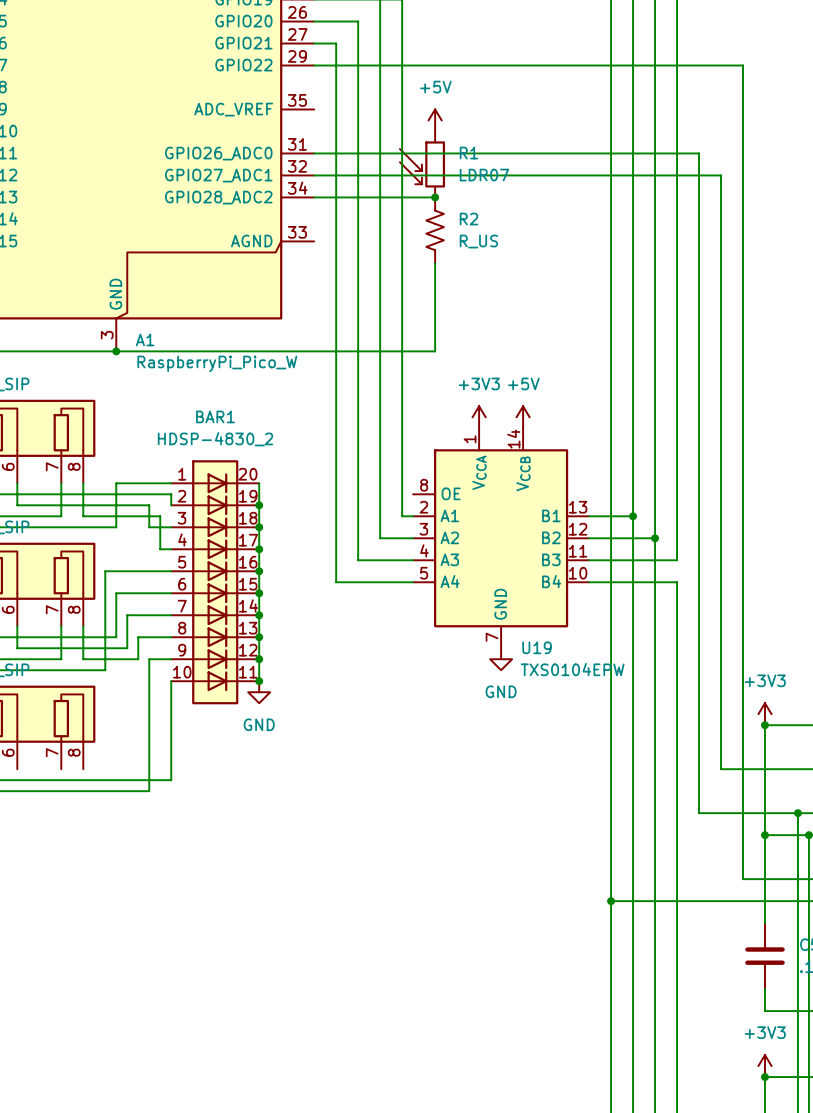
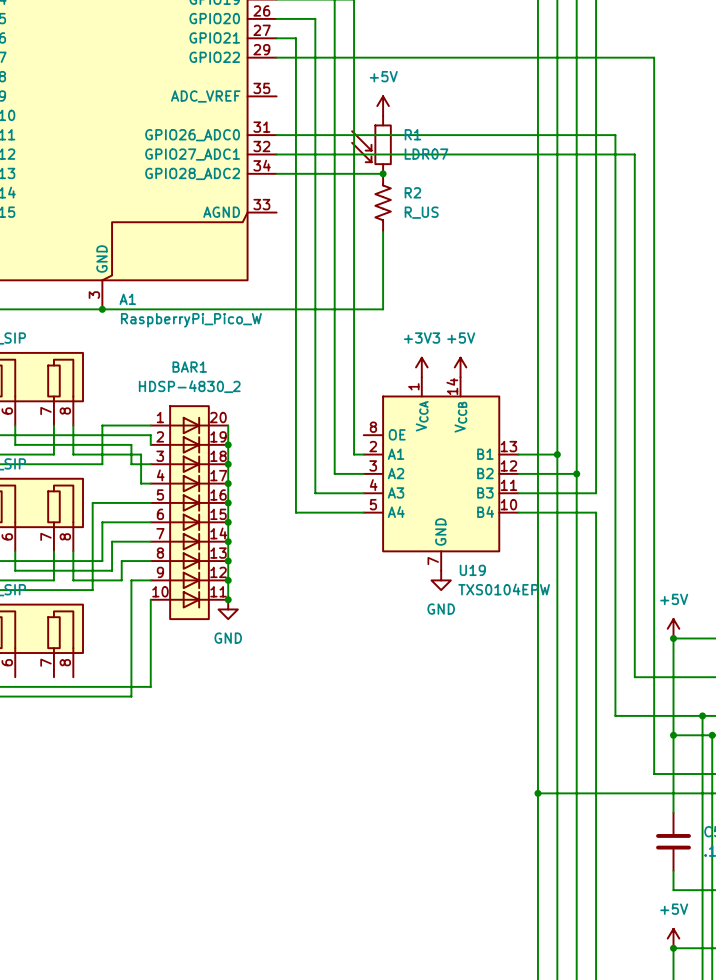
power symbol: +3V3 (764, 714) -> +5V (673, 628)
power symbol: +3V3 (764, 1066) -> +5V (673, 938)

